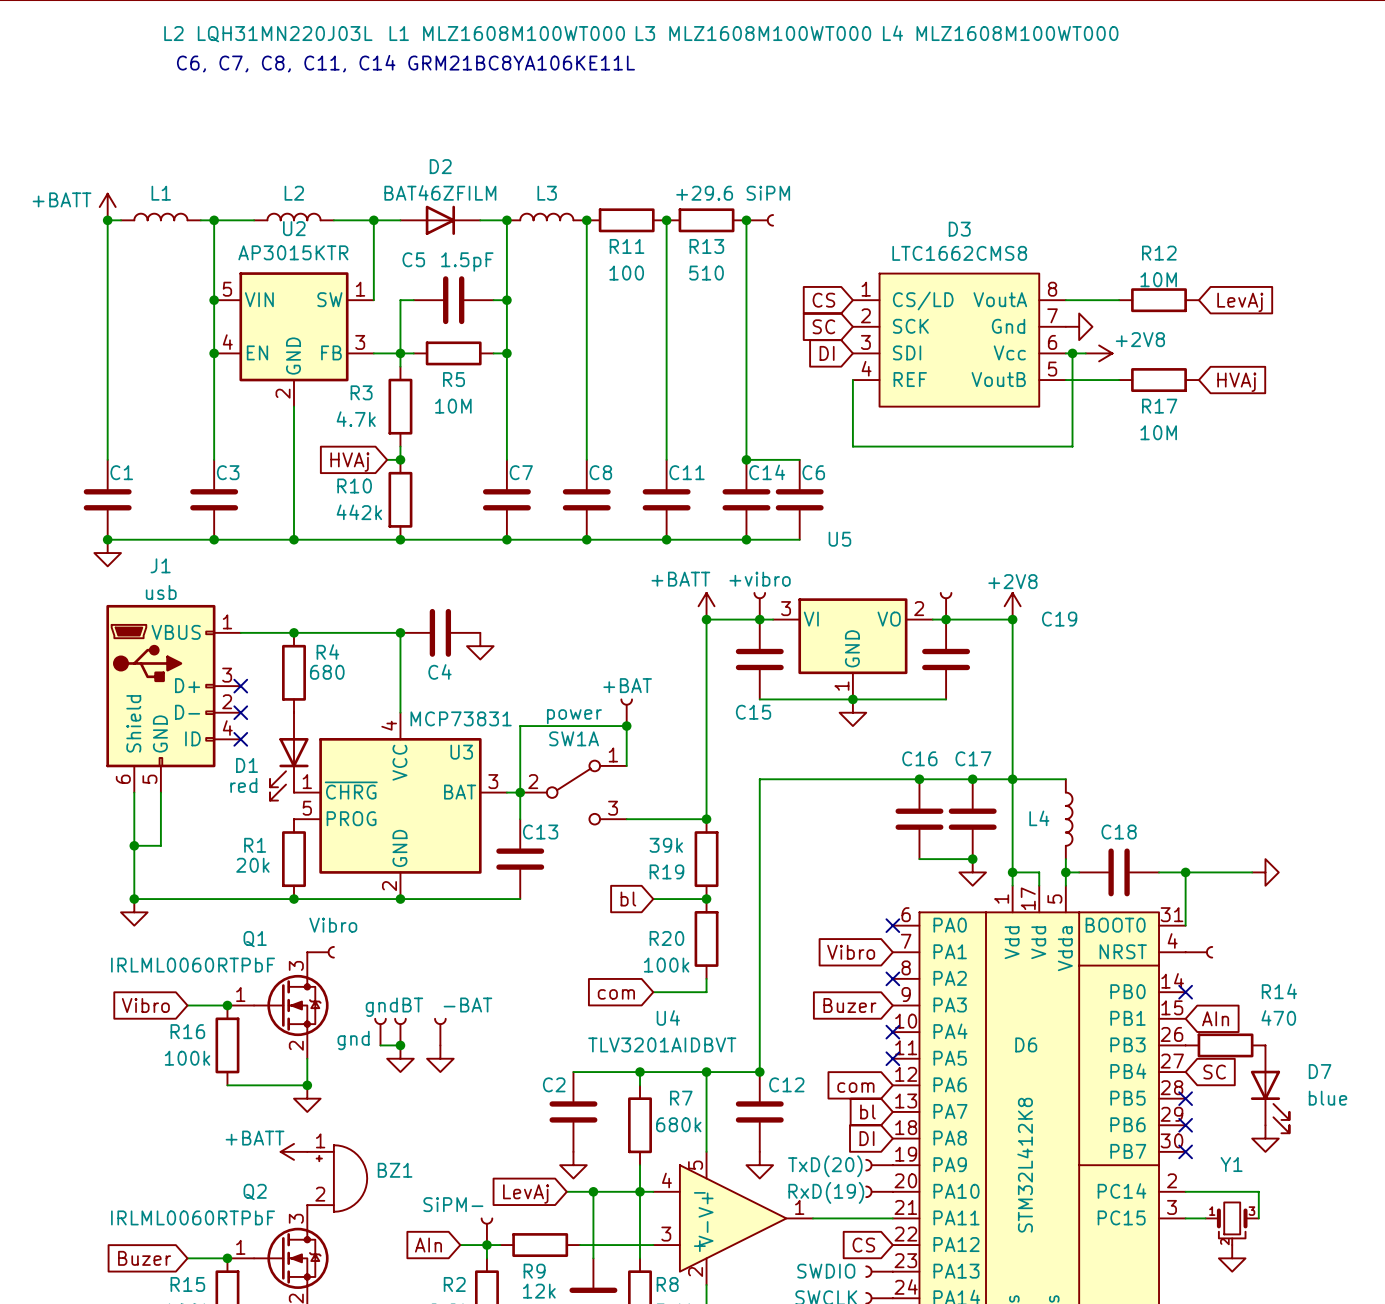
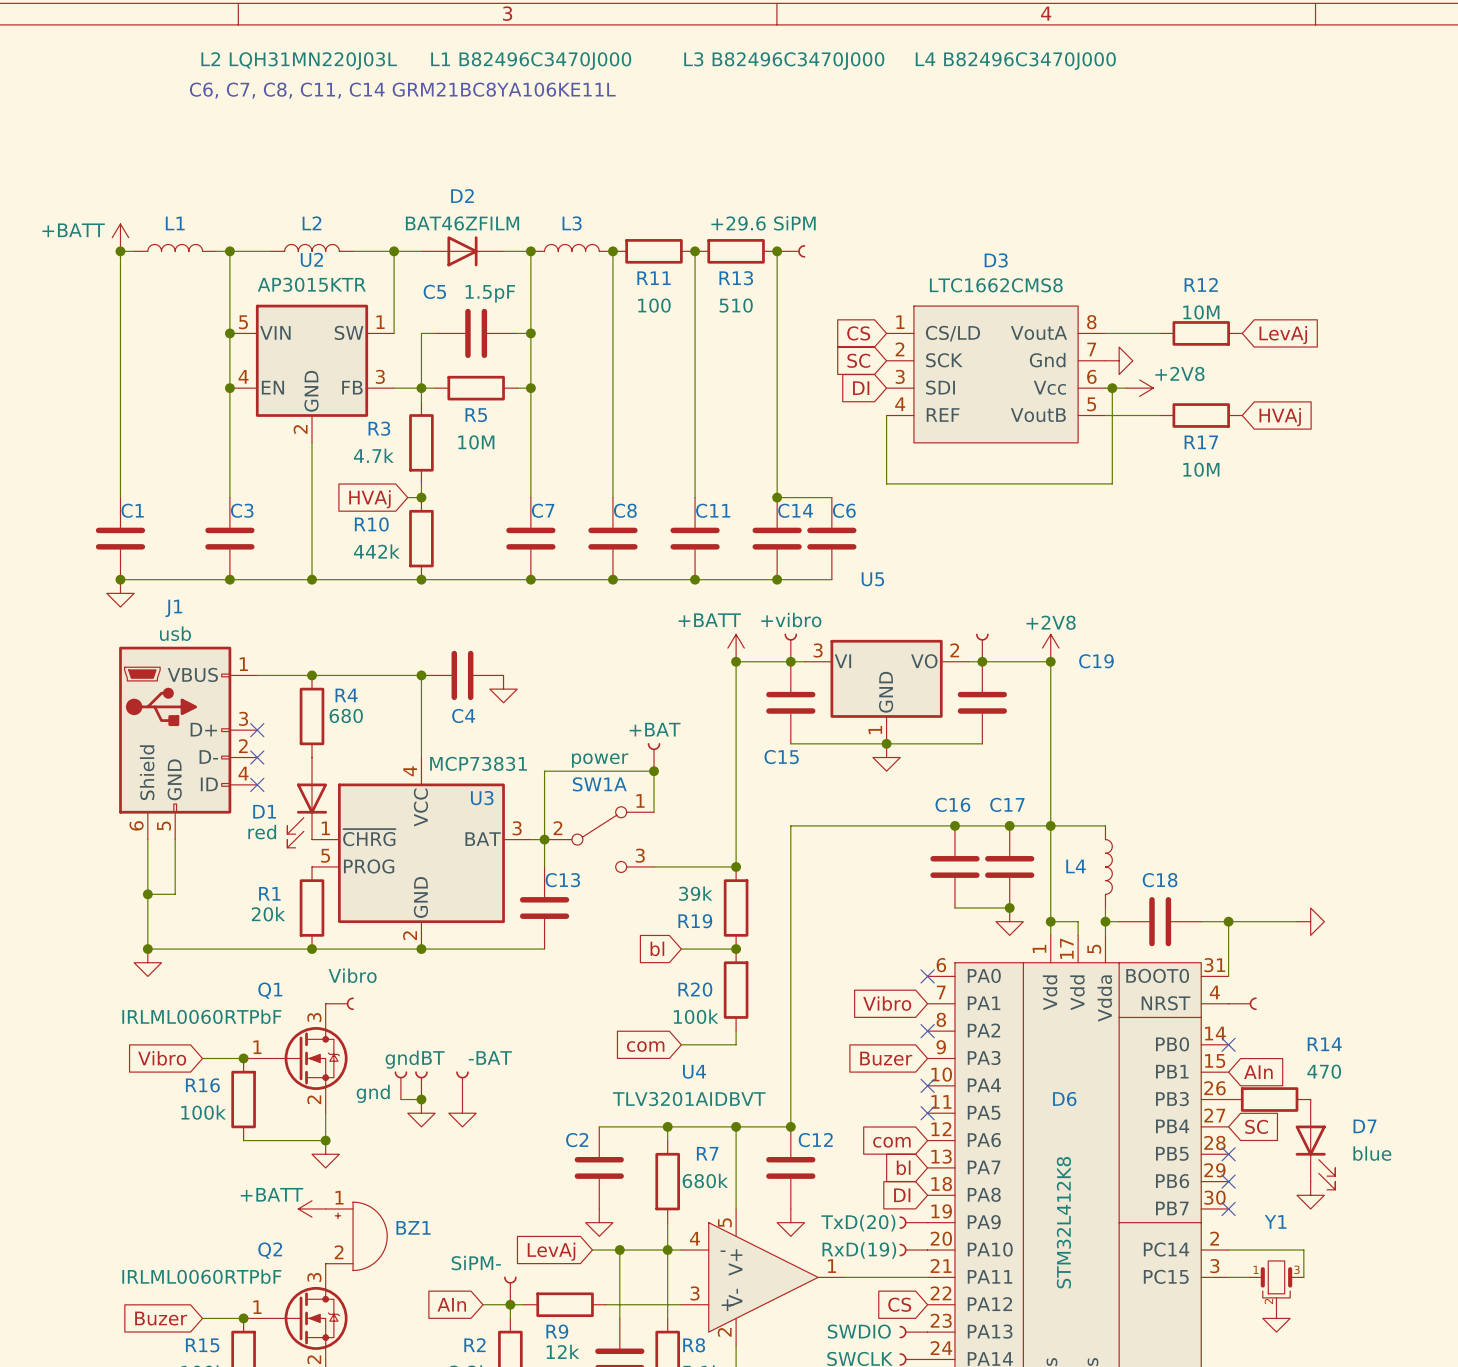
L1 value: L1 MLZ1608M100WT000 (507, 33) -> L1 B82496C3470J000 (531, 61)
L3 value: L3 MLZ1608M100WT000 (753, 33) -> L3 B82496C3470J000 (784, 61)
L4 value: L4 MLZ1608M100WT000 (1000, 33) -> L4 B82496C3470J000 (1015, 61)
L2 value position: L2 LQH31MN220J03L (268, 34) -> L2 LQH31MN220J03L (299, 61)

